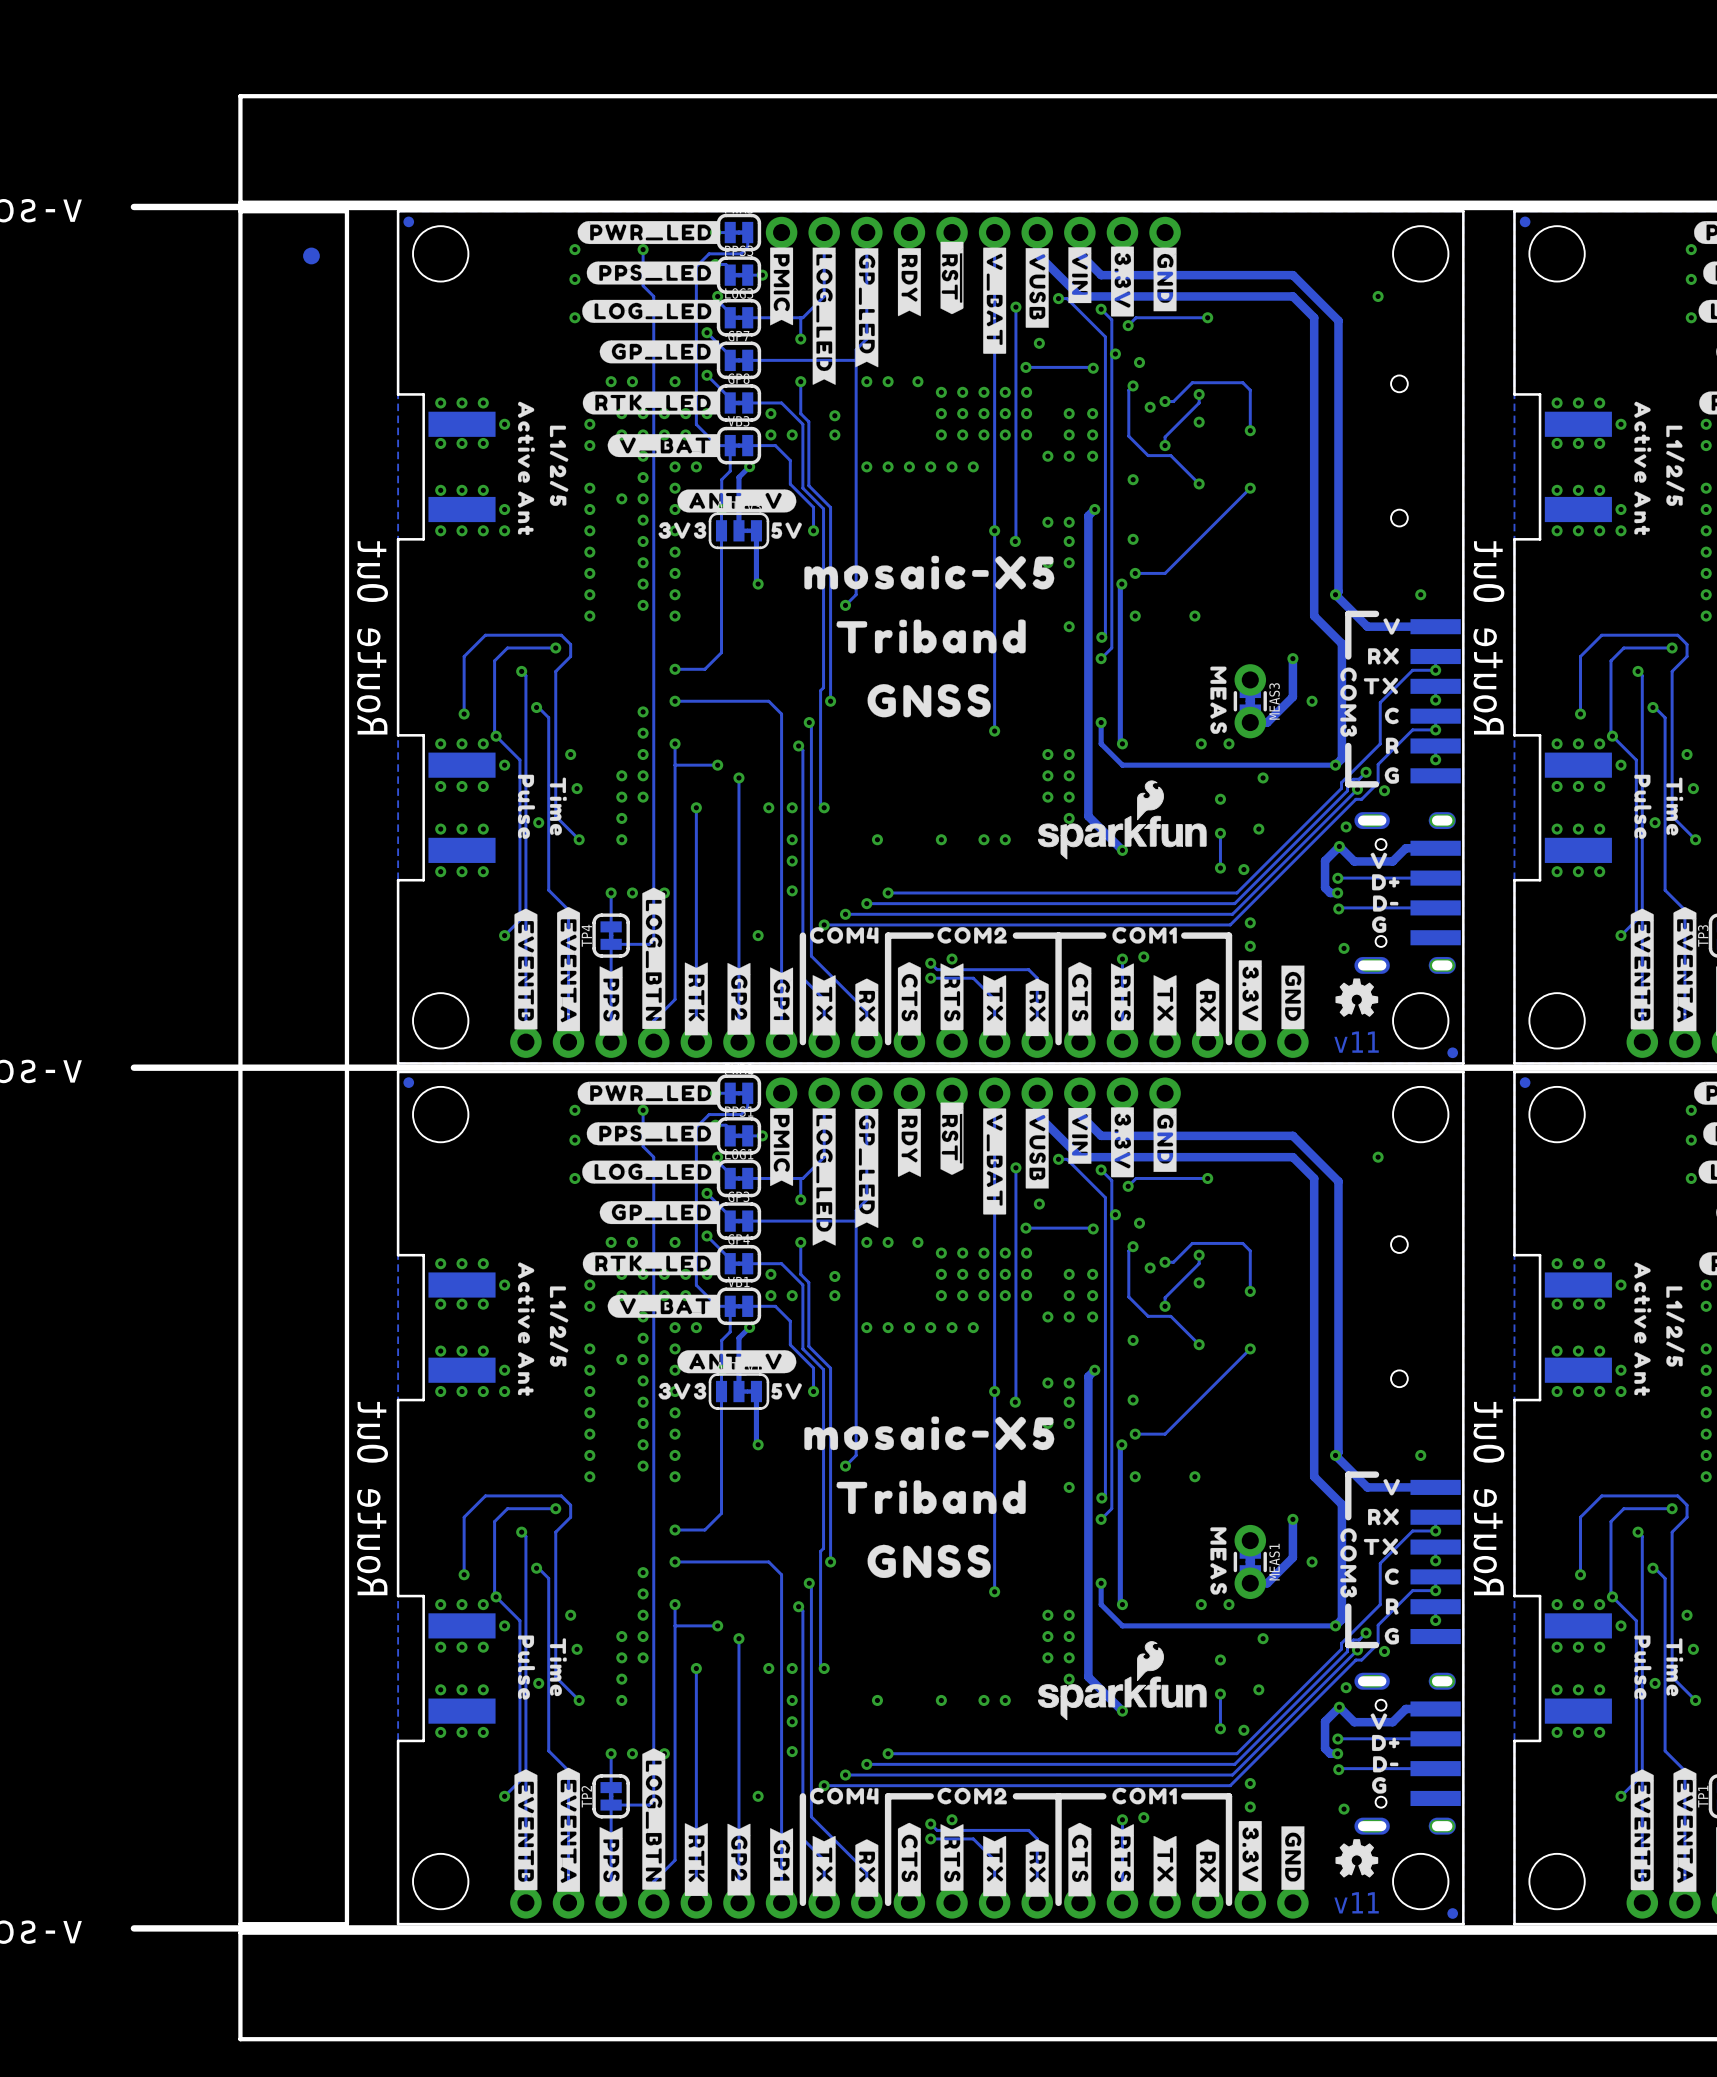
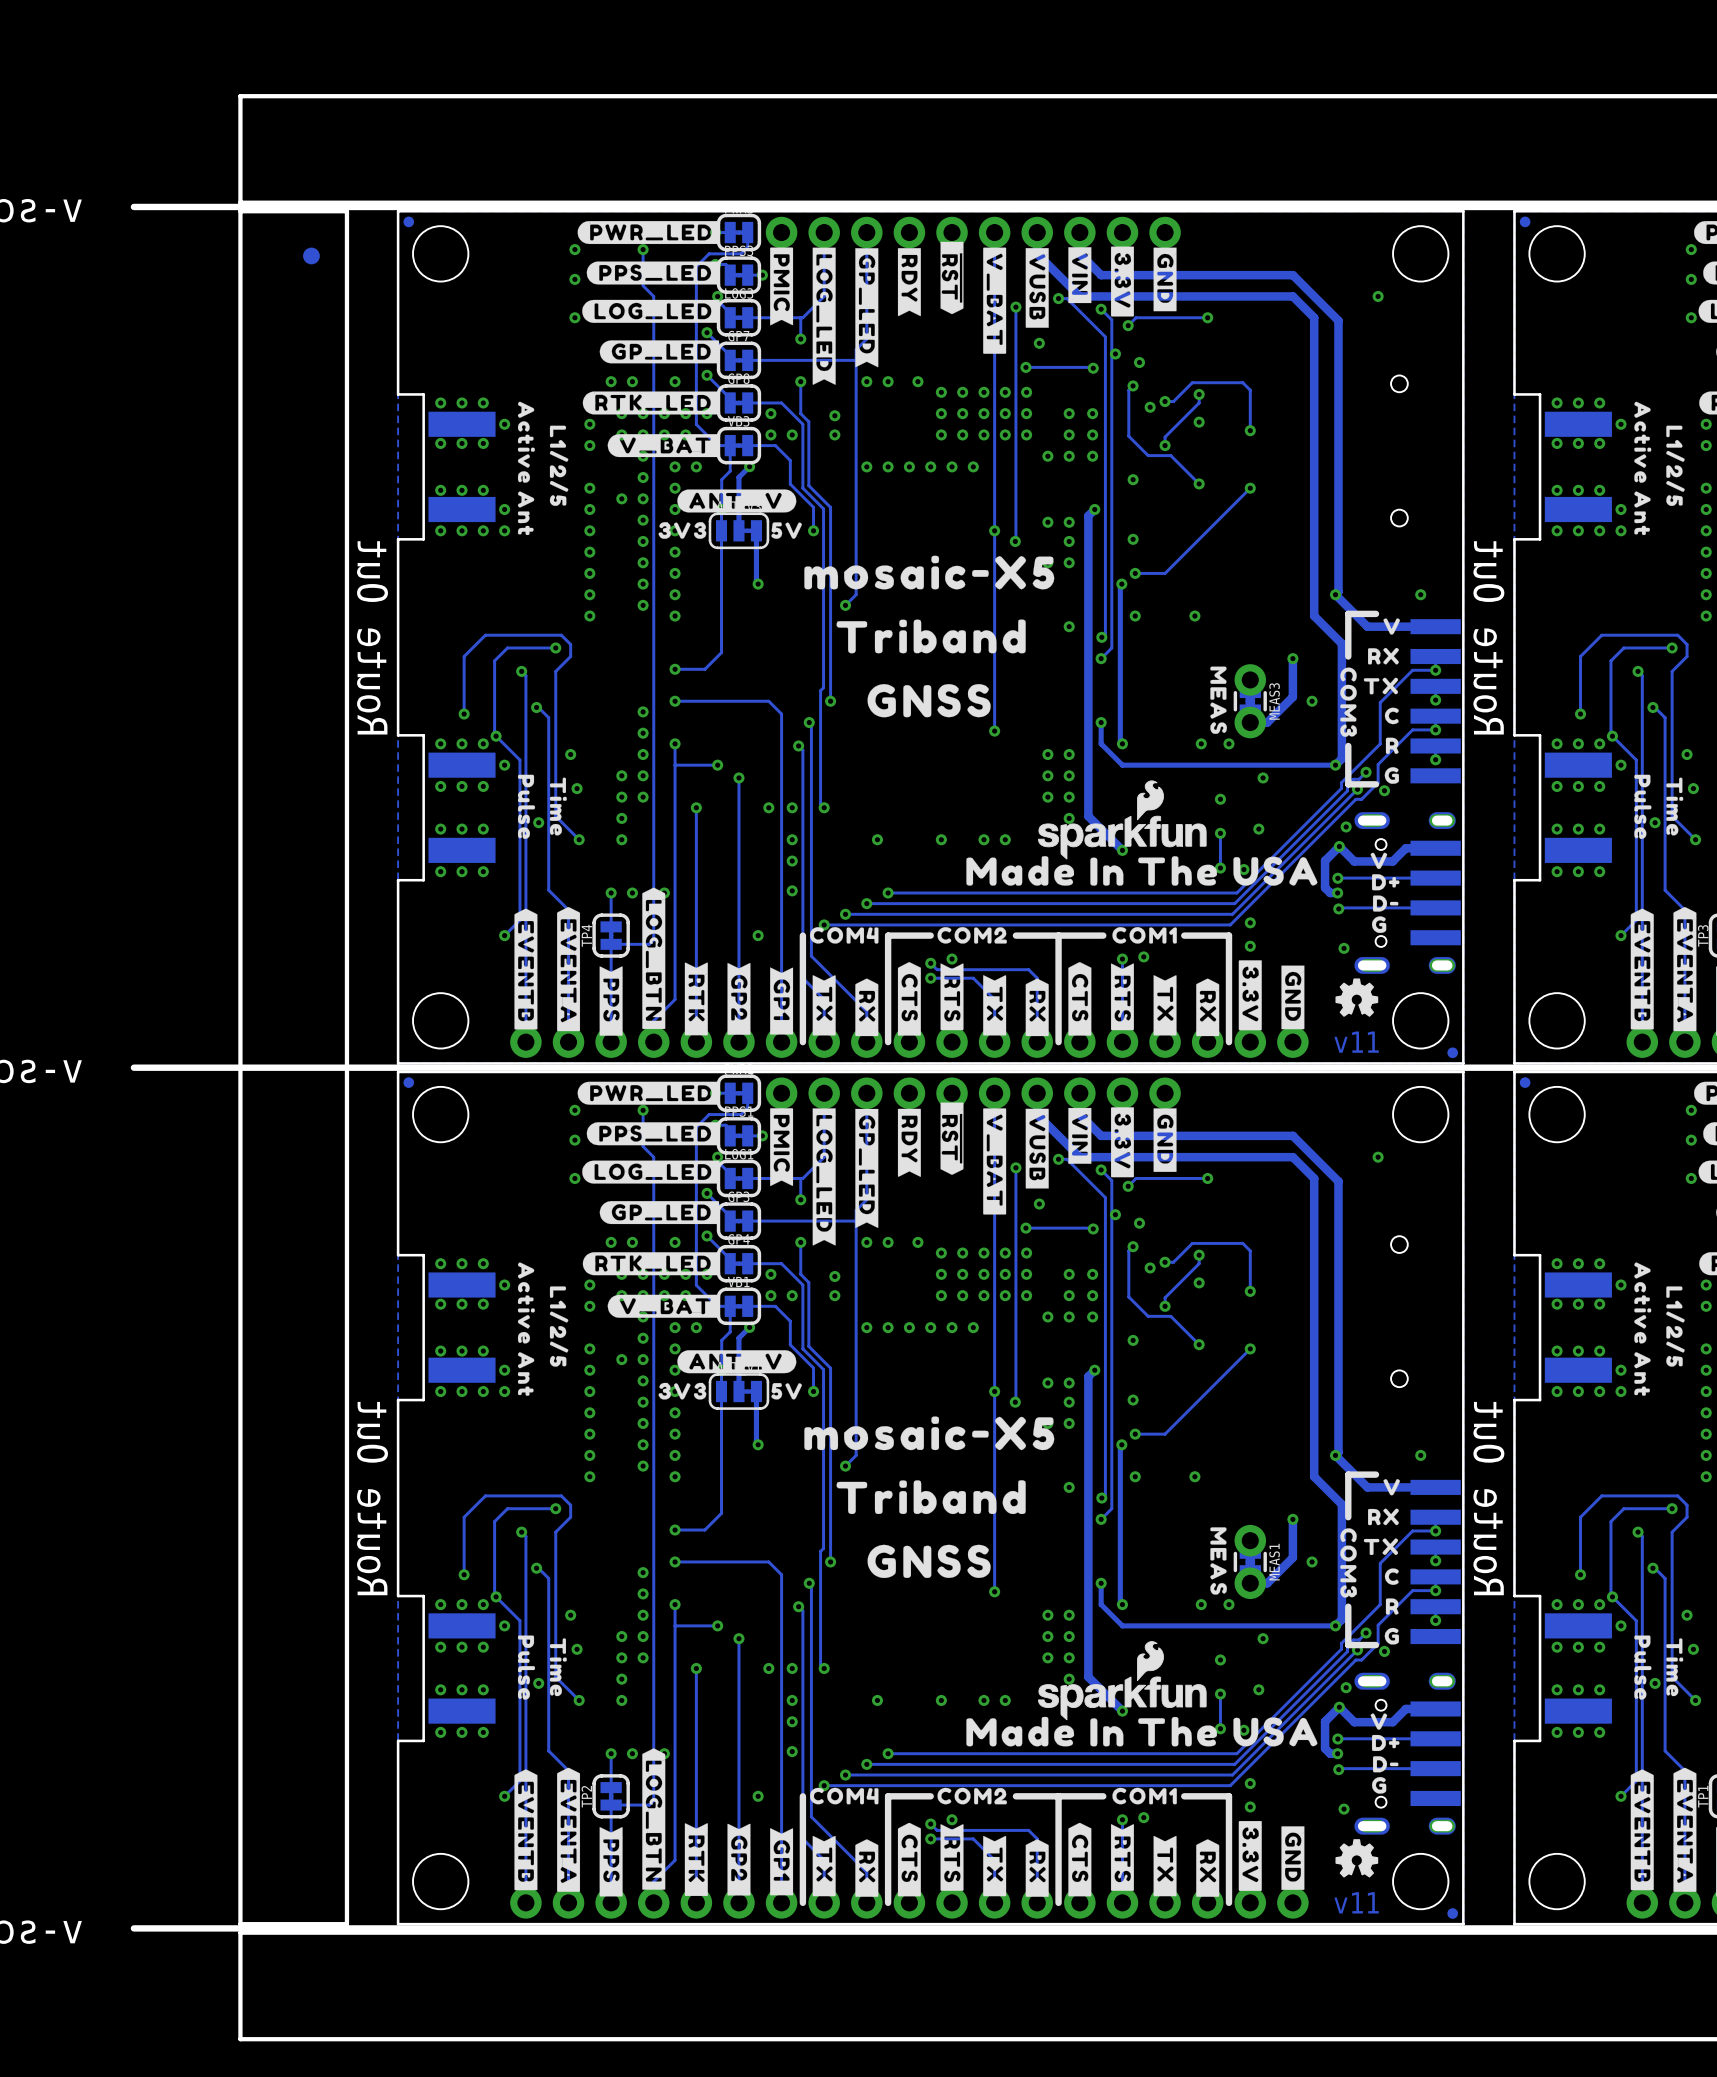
drawing: none -> [966, 856, 1318, 886]
drawing: none -> [966, 1716, 1318, 1747]

